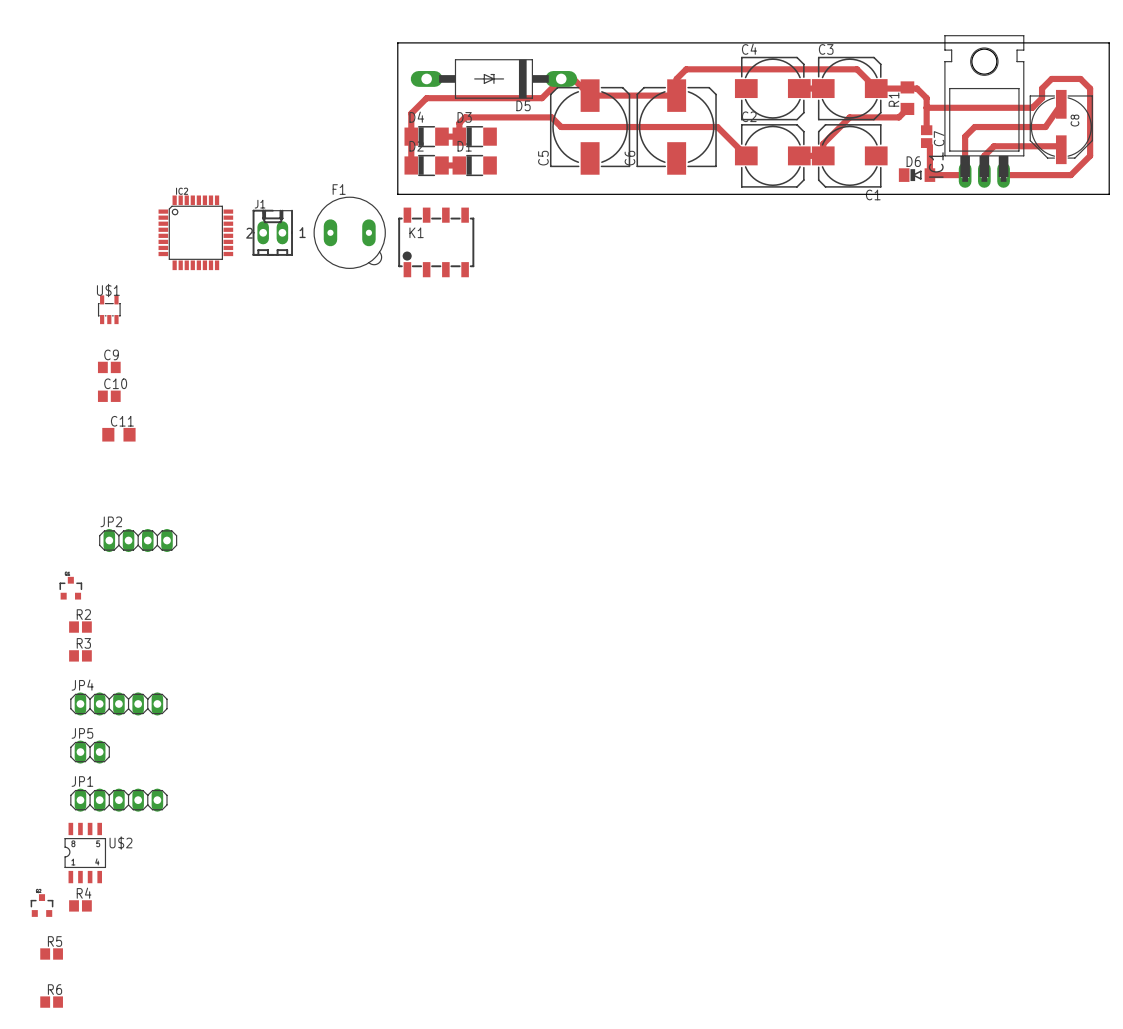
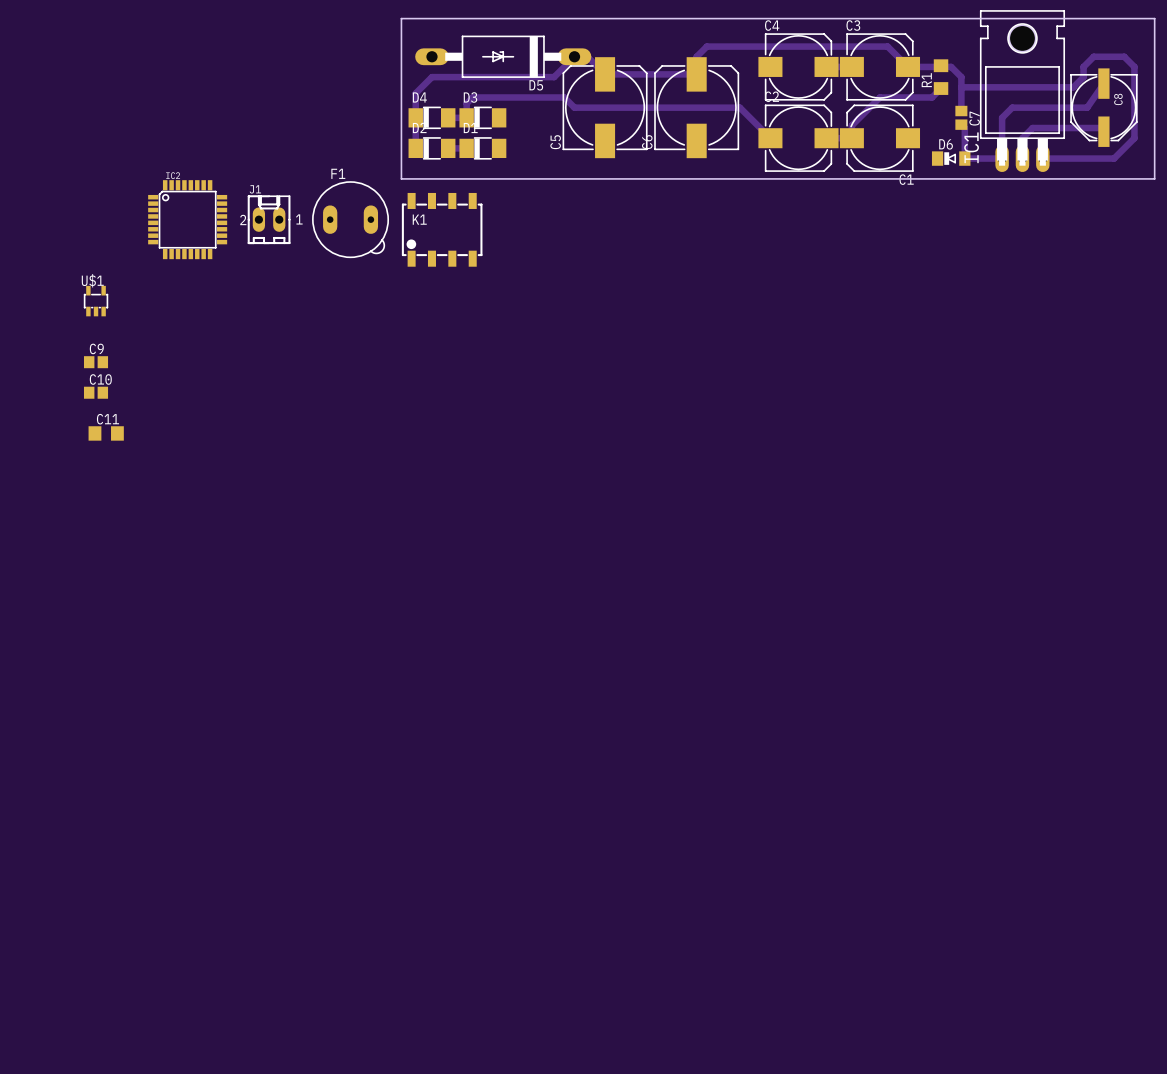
JP2: (138, 540) -> none
part: (70, 588) -> none
R2: (80, 627) -> none
R3: (80, 655) -> none
JP4: (118, 703) -> none
JP5: (90, 752) -> none
JP1: (118, 800) -> none
U$2: (85, 853) -> none
part: (42, 905) -> none
R4: (80, 905) -> none
R5: (51, 953) -> none
R6: (51, 1002) -> none

